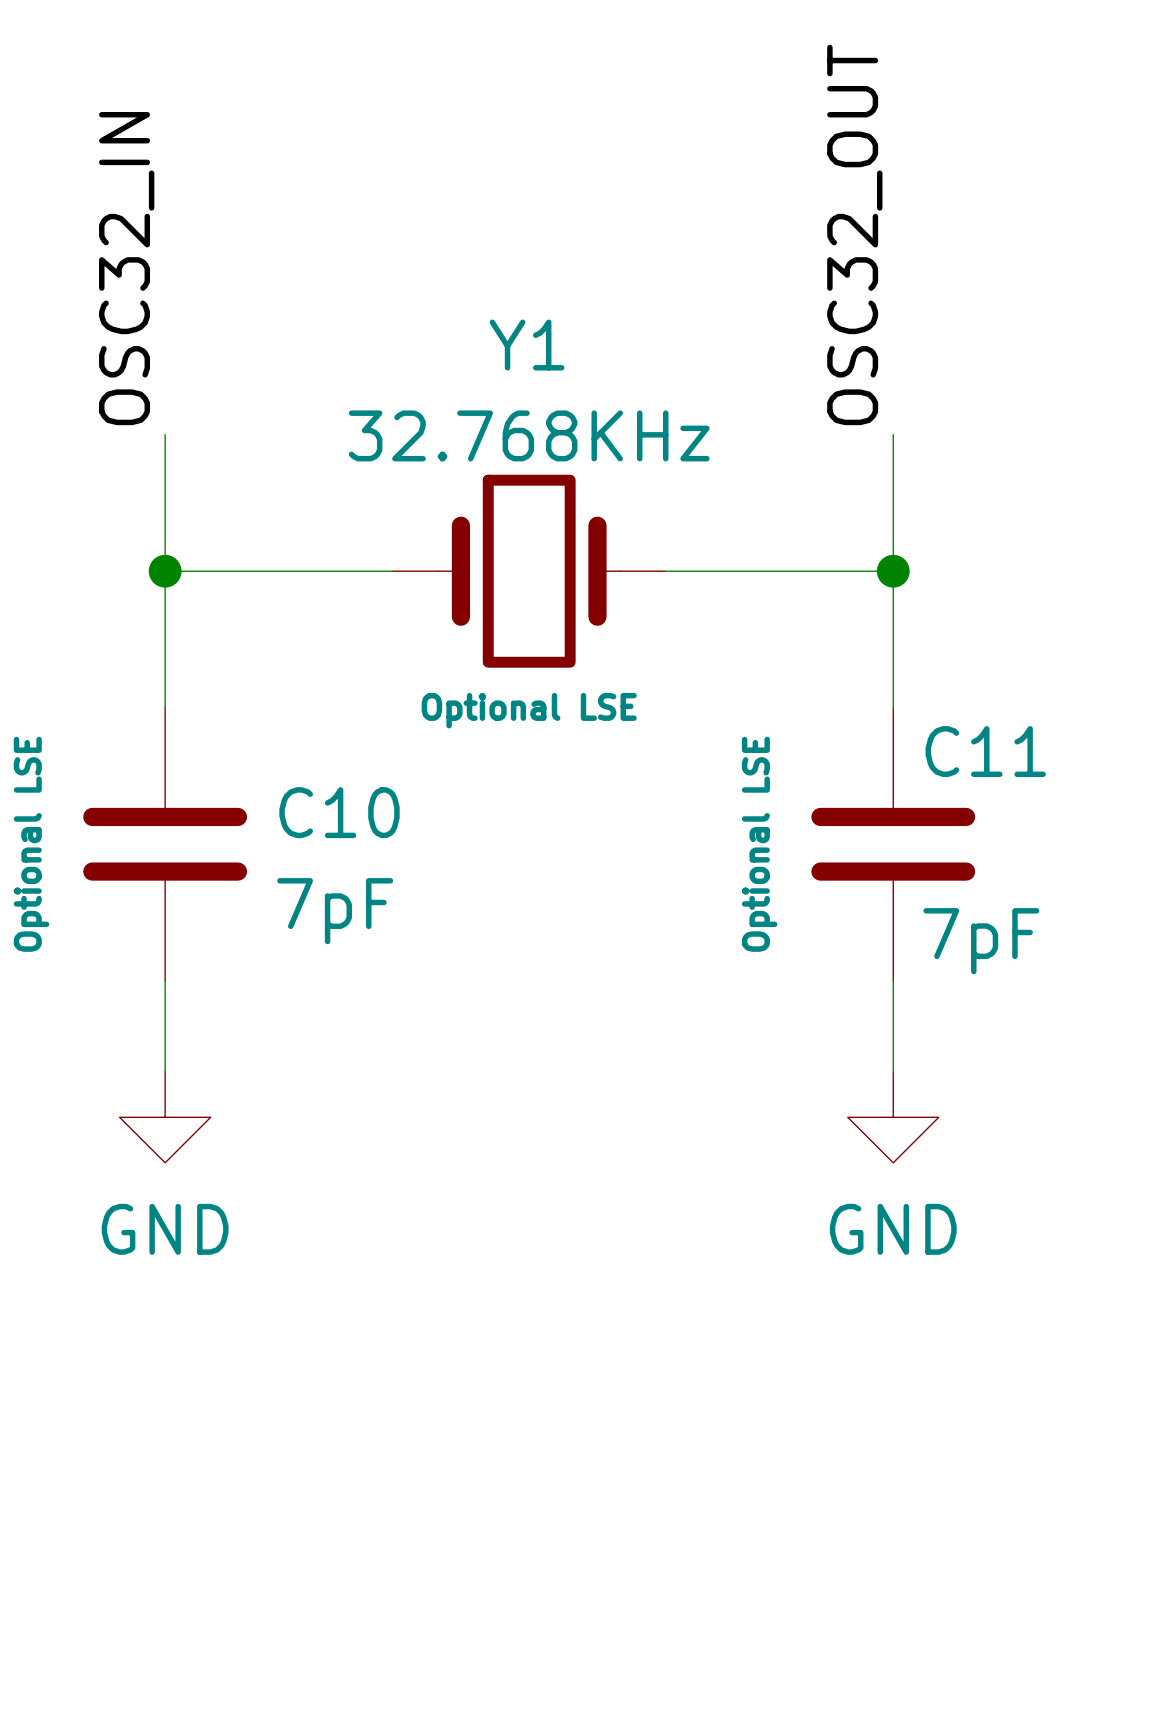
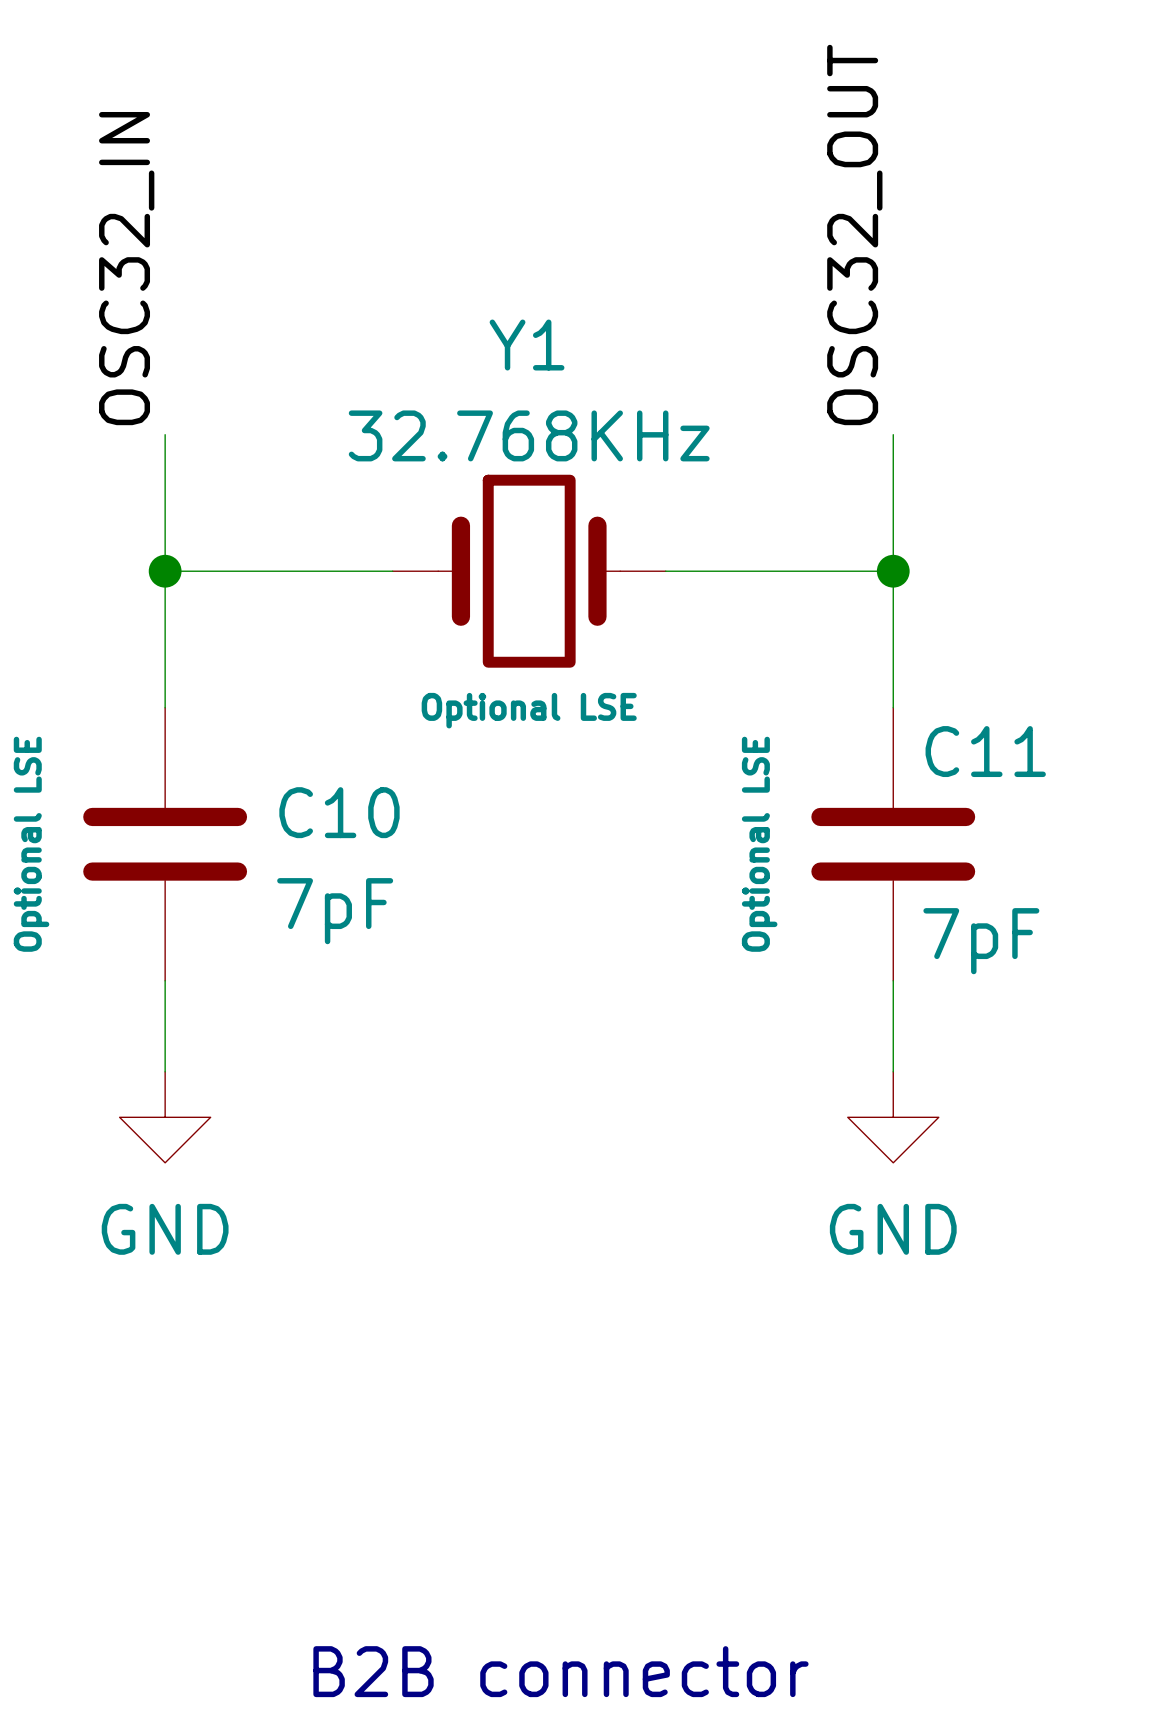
text: none -> B2B connector (560, 1671)

